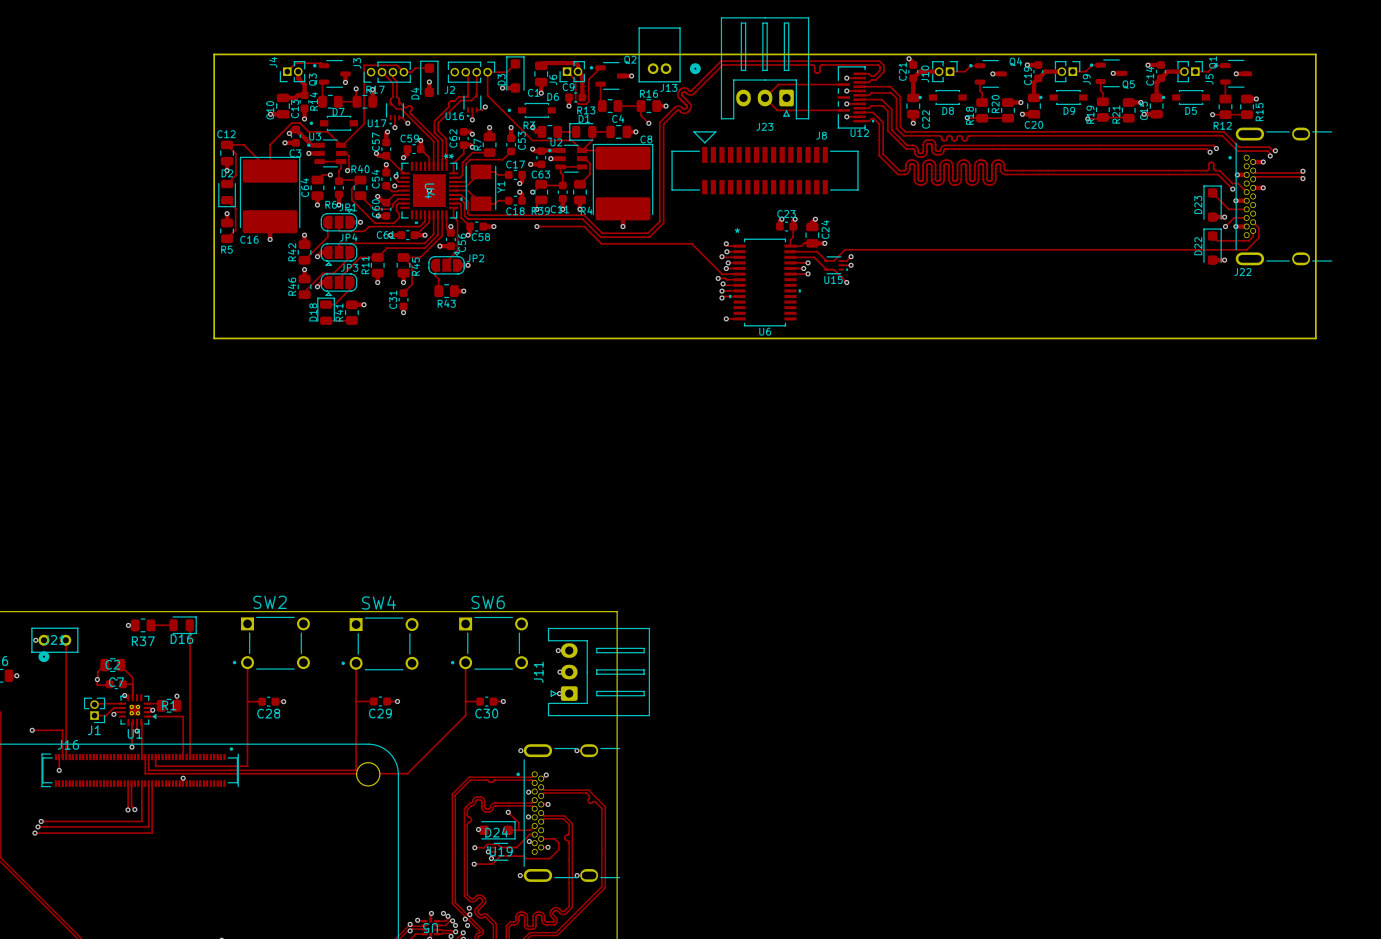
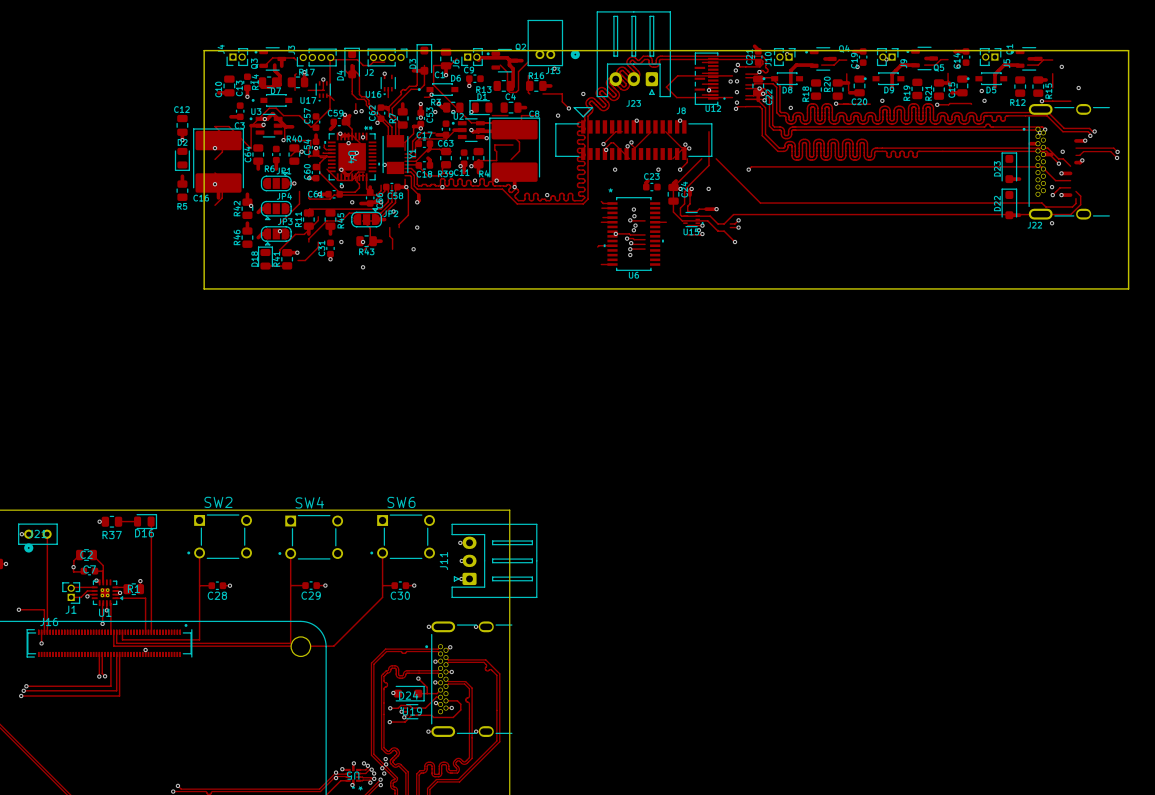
board edge: (214, 54) (1315, 54) (1315, 338) (214, 338) (214, 54) -> (204, 50) (1128, 50) (1128, 288) (204, 288) (204, 50)
via: (909, 58) -> none
track: (515, 63) (507, 72) (487, 72) (487, 95) (532, 140) (572, 140) (582, 150) (592, 140) (592, 131) (610, 131) -> none
via: (1027, 64) -> none
track: (323, 65) (321, 63) (295, 63) (287, 71) -> (296, 60) (294, 57) (272, 57) (265, 65)
track: (541, 65) (543, 63) (575, 63) (577, 65) (577, 71) (582, 75) (582, 97) -> (478, 60) (480, 57) (507, 57) (509, 65) (513, 68) (513, 86)
track: (979, 65) (970, 65) (964, 71) (950, 71) -> (846, 60) (839, 60) (834, 65) (821, 65)
track: (1100, 65) (1092, 65) (1085, 71) (1072, 71) -> (948, 59) (940, 59) (935, 65) (924, 65)
via: (1148, 65) -> none
track: (1225, 65) (1214, 65) (1208, 71) (1195, 71) -> (1052, 60) (1043, 60) (1038, 65) (1027, 65)
track: (600, 67) (588, 79) (588, 101) (586, 104) (578, 104) (575, 101) (575, 80) (567, 71) -> (528, 61) (518, 71) (518, 90) (516, 92) (509, 92) (507, 89) (507, 72) (500, 65)
track: (429, 68) (415, 68) (411, 72) (403, 72) (396, 65) (364, 65) (364, 123) (342, 145) (327, 131) (308, 131) (300, 123) (291, 123) (270, 144) (270, 171) (243, 144) (227, 144) (235, 153) (235, 175) (227, 184) -> (384, 62) (373, 62) (369, 65) (363, 65) (357, 59) (330, 59) (330, 108) (312, 126) (299, 115) (283, 115) (276, 108) (269, 108) (251, 126) (251, 148) (229, 126) (215, 126) (222, 133) (222, 152) (215, 159)
via: none -> (787, 54)
track: (298, 71) (298, 78) (304, 84) (304, 95) (298, 95) (295, 97) (283, 97) -> (274, 65) (274, 70) (280, 75) (280, 84) (261, 87)
track: (939, 71) (919, 71) (913, 78) (913, 97) -> (812, 65) (796, 65) (790, 70) (790, 87)
track: (1061, 71) (1045, 71) (1034, 82) (1034, 97) -> none
track: (1184, 71) (1167, 71) (1156, 82) (1156, 97) -> (1018, 65) (1004, 65) (994, 74) (994, 87)
track: (382, 72) (392, 83) (392, 96) (390, 103) (396, 109) (401, 109) (433, 141) (433, 166) -> none
track: (392, 72) (392, 77) (396, 81) (396, 96) (399, 103) (405, 107) (410, 106) (410, 113) (437, 140) (437, 166) -> none
track: (465, 72) (468, 74) (468, 95) (450, 101) (449, 106) (434, 121) (434, 132) (442, 140) (442, 166) -> (415, 65) (417, 67) (417, 84) (402, 89) (401, 94) (388, 106) (388, 116) (395, 122) (395, 144)
track: (476, 72) (476, 95) (471, 100) (460, 100) (438, 122) (438, 130) (446, 138) (446, 166) -> (424, 65) (424, 84) (420, 89) (411, 89) (392, 108) (392, 114) (398, 121) (399, 144)
track: none -> (456, 58) (449, 65) (433, 65) (433, 85) (471, 122) (519, 122) (521, 115) (536, 115)
track: (859, 73) (869, 73) (874, 76) (879, 70) (879, 67) (877, 64) (821, 64) (819, 72) (816, 73) (812, 64) (722, 64) (693, 93) (689, 94) (683, 92) (681, 94) (690, 103) (690, 109) (684, 113) (677, 110) (663, 124) (663, 223) (649, 237) (600, 237) (582, 219) (467, 219) (464, 215) (464, 203) (460, 199) (453, 199) -> none
via: (992, 73) -> none
via: (1113, 73) -> none
via: (1236, 73) -> none
via: none -> (886, 59)
via: (631, 75) -> none
via: (846, 78) -> none
track: none -> (344, 65) (344, 70) (352, 77) (352, 94) (357, 99) (364, 99) (366, 105) (388, 127) (388, 144)
via: (429, 81) -> none
track: none -> (354, 65) (354, 70) (359, 75) (359, 94) (365, 96) (368, 100) (368, 104) (374, 107)
track: none -> (737, 64) (739, 66) (760, 66) (762, 61) (761, 59) (660, 59) (658, 65) (653, 67) (649, 65) (648, 59) (644, 59) (638, 63) (631, 60) (630, 63) (639, 72) (638, 77) (632, 79) (621, 70) (620, 73) (629, 82) (628, 87) (622, 89) (611, 80) (609, 83) (619, 93) (618, 98) (612, 100) (600, 91) (599, 93) (609, 104) (608, 107) (604, 110) (592, 101) (589, 102) (592, 109) (588, 116) (588, 199) (583, 203) (517, 203) (502, 189) (417, 189) (414, 186) (414, 175) (410, 172) (405, 172)
via: none -> (737, 64)
track: (1100, 81) (1102, 101) -> (915, 65) (901, 65) (892, 74) (892, 87)
track: (1225, 81) (1225, 98) -> (1052, 73) (1052, 87)
track: (323, 82) (322, 101) -> (296, 73) (295, 90)
via: (345, 82) -> none
track: (859, 82) (875, 80) (883, 72) (883, 65) (879, 61) (721, 61) (691, 90) (685, 87) (681, 89) (677, 95) (687, 107) (684, 109) (680, 106) (676, 106) (659, 122) (659, 221) (648, 233) (602, 233) (584, 215) (469, 215) (468, 201) (461, 194) (453, 194) -> none
track: (979, 82) (982, 102) -> (846, 73) (848, 90)
via: none -> (958, 66)
via: none -> (857, 66)
via: none -> (1061, 66)
track: (600, 84) (600, 104) (602, 106) -> (528, 75) (529, 93)
track: (843, 84) (778, 84) (765, 98) (777, 110) (843, 110) -> (732, 75) (677, 75) (666, 87) (676, 97) (732, 97)
via: none -> (554, 68)
track: (859, 86) (890, 86) (900, 96) (900, 126) (905, 131) (1223, 131) (1239, 147) (1269, 147) (1275, 150) -> none
via: none -> (735, 70)
track: (356, 88) (356, 101) (338, 101) -> (323, 79) (323, 90) (308, 90)
via: (356, 88) -> none
via: (502, 88) -> none
via: none -> (759, 72)
via: (846, 90) -> none
via: none -> (384, 73)
track: none -> (745, 74) (757, 74) (761, 70) (766, 72) (766, 59) (762, 56) (660, 56) (653, 63) (648, 56) (643, 56) (638, 60) (633, 57) (629, 57) (627, 63) (636, 75) (633, 76) (624, 67) (619, 68) (616, 74) (626, 85) (623, 86) (613, 77) (609, 78) (606, 84) (615, 95) (613, 97) (603, 88) (598, 88) (596, 94) (605, 105) (603, 107) (593, 98) (589, 98) (586, 103) (589, 109) (584, 114) (584, 121) (577, 123) (578, 126) (584, 128) (583, 130) (577, 132) (578, 135) (584, 136) (583, 139) (577, 141) (578, 143) (584, 145) (583, 148) (577, 150) (578, 152) (584, 154) (583, 156) (577, 158) (578, 161) (584, 162) (583, 165) (577, 167) (578, 169) (584, 171) (583, 174) (577, 175) (578, 178) (584, 180) (583, 182) (577, 184) (578, 187) (584, 188) (584, 191) (578, 193) (579, 195) (584, 197) (581, 200) (573, 200) (570, 193) (568, 194) (566, 200) (564, 199) (562, 193) (559, 194) (558, 200) (553, 195) (549, 200) (539, 200) (536, 193) (533, 194) (533, 200) (530, 200) (529, 194) (526, 193) (524, 200) (518, 200) (514, 196) (518, 191) (517, 189) (510, 192) (509, 184) (494, 185) (491, 181) (485, 185) (482, 178) (480, 179) (478, 185) (471, 185) (469, 180) (466, 181) (466, 185) (463, 185) (460, 179) (458, 180) (456, 185) (453, 185) (453, 180) (450, 179) (448, 185) (446, 185) (444, 179) (442, 178) (439, 185) (418, 185) (417, 174) (411, 168) (405, 168)
track: none -> (948, 73) (949, 90)
track: (859, 95) (891, 92) (896, 98) (896, 128) (903, 135) (939, 135) (943, 140) (950, 135) (954, 140) (959, 135) (964, 140) (969, 135) (1222, 135) (1237, 151) (1267, 151) (1270, 156) -> none
track: none -> (745, 77) (771, 77) (779, 86) (779, 111) (787, 113) (790, 120) (792, 120) (793, 114) (797, 112) (801, 113) (803, 120) (806, 120) (807, 106) (811, 103) (817, 106) (819, 120) (821, 119) (822, 107) (825, 103) (831, 106) (833, 120) (835, 120) (837, 114) (840, 112) (845, 114) (847, 120) (850, 120) (851, 114) (855, 112) (859, 113) (862, 120) (865, 120) (866, 113) (872, 112) (875, 120) (878, 120) (879, 109) (884, 106) (889, 108) (890, 119) (893, 120) (894, 108) (900, 106) (904, 108) (904, 119) (907, 120) (909, 106) (915, 103) (918, 106) (919, 119) (921, 120) (923, 106) (928, 103) (933, 106) (934, 120) (937, 120) (938, 114) (941, 112) (946, 113) (949, 120) (951, 120) (954, 112) (960, 113) (962, 120) (965, 120) (967, 113) (973, 112) (976, 115) (977, 120) (979, 120) (981, 114) (984, 112) (1048, 112) (1064, 128) (1089, 128) (1094, 131)
via: none -> (323, 79)
via: (1256, 98) -> none
track: (859, 99) (881, 99) (891, 109) (891, 129) (907, 145) (916, 146) (919, 153) (923, 152) (923, 142) (927, 140) (934, 141) (936, 151) (940, 150) (945, 145) (1213, 145) (1216, 148) -> none
via: none -> (730, 81)
via: none -> (737, 81)
via: (1020, 102) -> none
via: (1140, 102) -> none
via: (846, 103) -> none
track: none -> (745, 84) (773, 83) (776, 87) (776, 112) (779, 115) (785, 116) (786, 121) (789, 123) (794, 122) (797, 115) (800, 116) (802, 123) (808, 122) (811, 107) (814, 108) (815, 121) (822, 123) (825, 119) (825, 107) (827, 107) (829, 120) (832, 123) (838, 122) (840, 115) (843, 116) (845, 122) (851, 123) (854, 116) (856, 115) (859, 122) (864, 123) (868, 121) (868, 116) (871, 115) (873, 122) (879, 123) (882, 120) (883, 110) (885, 109) (887, 121) (893, 123) (897, 120) (897, 110) (900, 109) (901, 121) (907, 123) (911, 120) (911, 108) (914, 107) (916, 121) (922, 123) (925, 120) (926, 108) (928, 107) (930, 120) (933, 123) (939, 122) (941, 115) (944, 116) (945, 121) (948, 123) (953, 122) (956, 115) (958, 116) (960, 122) (966, 123) (969, 116) (972, 115) (974, 122) (979, 123) (983, 121) (985, 115) (991, 116) (994, 121) (999, 115) (1003, 121) (1006, 115) (1047, 115) (1062, 131) (1088, 131) (1090, 135)
track: (485, 106) (482, 109) (476, 109) -> (431, 94) (429, 97) (424, 97)
via: (485, 106) -> none
track: (617, 106) (640, 106) (640, 115) (648, 123) -> (542, 93) (562, 93) (562, 101) (568, 108)
via: (666, 106) -> none
track: (859, 108) (882, 105) (887, 111) (887, 130) (906, 149) (914, 149) (915, 154) (919, 157) (926, 154) (927, 143) (931, 144) (932, 152) (936, 154) (941, 154) (945, 149) (1206, 149) (1210, 152) -> none
via: none -> (1078, 88)
track: none -> (745, 88) (764, 88) (772, 96) (772, 125) (782, 127) (785, 135) (788, 135) (789, 129) (793, 127) (984, 127) (988, 124) (991, 126) (1042, 127) (1045, 129)
via: none -> (759, 88)
via: none -> (708, 90)
track: (859, 112) (873, 112) (883, 122) (883, 154) (899, 170) (905, 170) (908, 161) (916, 161) (919, 181) (922, 180) (923, 164) (927, 160) (935, 163) (937, 181) (940, 179) (940, 163) (945, 160) (952, 163) (954, 181) (957, 179) (957, 163) (962, 160) (969, 163) (971, 181) (974, 179) (975, 163) (979, 160) (986, 163) (988, 181) (991, 179) (992, 163) (996, 160) (1003, 162) (1005, 170) (1206, 170) (1209, 163) (1211, 162) (1214, 170) (1219, 170) (1232, 183) (1238, 183) (1246, 192) -> none
via: none -> (981, 90)
via: none -> (736, 92)
via: (270, 114) -> none
via: (1022, 114) -> none
via: (1144, 114) -> none
track: (1212, 114) (1247, 114) -> (1041, 101) (1070, 101)
via: (1212, 114) -> none
via: none -> (583, 93)
via: none -> (763, 93)
via: none -> (431, 94)
via: (846, 116) -> none
track: (394, 117) (394, 127) -> (355, 103) (355, 112)
track: none -> (745, 95) (765, 93) (769, 98) (769, 126) (773, 130) (780, 130) (781, 136) (785, 138) (790, 137) (793, 130) (1037, 130) (1039, 132)
track: (967, 117) (1007, 118) -> (836, 103) (870, 104)
via: (967, 117) -> none
via: (1087, 118) -> none
track: (1128, 118) (1087, 118) -> (971, 104) (937, 104)
via: (472, 119) -> none
track: (859, 121) (869, 121) (873, 118) (879, 124) (879, 155) (897, 174) (907, 173) (910, 164) (913, 164) (914, 180) (918, 184) (926, 181) (928, 164) (931, 165) (931, 180) (935, 184) (940, 184) (943, 181) (945, 164) (948, 165) (948, 180) (951, 184) (957, 184) (960, 182) (961, 165) (964, 164) (966, 181) (970, 184) (975, 184) (978, 180) (978, 165) (981, 164) (983, 181) (991, 184) (995, 180) (995, 165) (999, 164) (1001, 171) (1005, 174) (1218, 174) (1231, 187) -> none
via: (407, 123) -> none
via: (648, 123) -> none
via: (913, 123) -> none
track: none -> (764, 100) (763, 99) (745, 99) (757, 99) (765, 107) (765, 134) (779, 148) (784, 147) (787, 141) (793, 142) (796, 156) (799, 156) (799, 142) (802, 139) (809, 141) (810, 156) (813, 156) (813, 143) (816, 139) (820, 139) (823, 141) (825, 156) (828, 155) (828, 141) (836, 140) (838, 143) (838, 155) (841, 156) (843, 141) (850, 139) (852, 142) (853, 156) (855, 156) (857, 142) (862, 139) (867, 142) (868, 156) (871, 156) (872, 150) (875, 148) (1047, 148) (1058, 158) (1063, 158) (1070, 166)
via: none -> (764, 100)
via: none -> (882, 100)
via: none -> (984, 100)
via: none -> (1041, 101)
via: none -> (736, 102)
via: (394, 127) -> none
via: (489, 127) -> none
via: none -> (836, 103)
via: none -> (937, 104)
track: (387, 131) (386, 142) -> (349, 115) (348, 124)
via: (387, 131) -> none
track: (557, 131) (576, 131) -> (492, 115) (507, 115)
via: (635, 131) -> none
via: none -> (568, 108)
via: none -> (790, 107)
track: (289, 133) (295, 129) (311, 145) (319, 145) -> none
via: (289, 133) -> none
track: none -> (736, 108) (738, 106) (759, 106) (762, 109) (762, 135) (777, 151) (785, 150) (788, 145) (791, 145) (792, 157) (796, 160) (802, 157) (803, 142) (806, 143) (806, 156) (809, 159) (816, 157) (818, 142) (820, 143) (820, 156) (823, 159) (830, 158) (831, 143) (834, 142) (835, 157) (838, 160) (843, 159) (845, 156) (845, 143) (848, 142) (850, 157) (856, 160) (860, 156) (860, 143) (862, 142) (864, 157) (868, 160) (873, 158) (875, 151) (885, 151) (888, 157) (893, 151) (897, 157) (901, 151) (906, 157) (910, 151) (914, 157) (919, 151) (1046, 151) (1057, 162)
via: none -> (736, 108)
via: (472, 134) -> none
track: none -> (378, 110) (377, 112) (391, 127) (391, 144)
via: none -> (361, 111)
via: none -> (355, 112)
via: none -> (435, 112)
via: none -> (453, 112)
via: none -> (471, 112)
via: none -> (558, 115)
via: (284, 142) -> none
via: none -> (420, 117)
track: none -> (264, 119) (272, 113) (285, 126) (292, 126)
via: none -> (264, 119)
track: (472, 147) (470, 144) (463, 145) (463, 153) (453, 163) (453, 173) -> (420, 128) (413, 126) (413, 133) (405, 142) (405, 150)
via: (472, 147) -> none
via: none -> (636, 120)
via: none -> (680, 120)
via: (1216, 148) -> none
track: (532, 149) (534, 151) (560, 150) -> (471, 130) (473, 131) (494, 131)
via: (532, 149) -> none
via: none -> (377, 122)
via: (1275, 150) -> none
track: (511, 151) (502, 159) (470, 159) (466, 164) (466, 181) (453, 181) -> (453, 132) (446, 138) (419, 138) (415, 142) (415, 157) (405, 157)
via: none -> (263, 124)
track: (489, 152) (472, 152) (462, 162) (462, 175) (459, 177) (453, 177) -> (435, 133) (420, 133) (412, 141) (412, 151) (410, 154) (405, 154)
via: (1210, 152) -> none
via: (308, 153) -> none
track: (376, 153) (378, 155) (386, 155) (405, 173) -> none
via: (376, 153) -> none
via: none -> (420, 128)
via: (1270, 156) -> none
via: (403, 157) -> none
via: (550, 158) -> none
via: none -> (471, 130)
track: (582, 158) (585, 158) (589, 163) (589, 174) (579, 184) -> (512, 138) (519, 142) (519, 151) (511, 159)
via: none -> (1045, 129)
track: none -> (622, 131) (615, 131) (603, 144)
track: none -> (651, 131) (635, 147) (631, 142)
track: none -> (665, 131) (681, 147) (684, 147) (685, 144)
track: none -> (708, 131) (708, 165) (686, 188) (684, 203) (680, 208) (680, 214) (710, 216) (718, 223) (724, 223) (733, 214) (1070, 214) (1080, 204) (1080, 196) (1075, 191)
via: none -> (1094, 131)
track: (319, 161) (341, 161) (338, 181) (360, 179) (351, 188) (351, 199) (375, 223) (394, 223) (399, 217) (396, 205) (398, 203) (405, 203) -> (292, 140) (310, 140) (308, 156) (326, 155) (319, 163) (319, 172) (339, 192) (355, 192) (359, 187) (357, 177) (364, 175)
via: none -> (1039, 132)
track: none -> (340, 133) (342, 135) (352, 135) (364, 147) (364, 150)
via: none -> (340, 133)
track: (1253, 162) (1263, 162) -> (1075, 140) (1084, 140)
via: (1263, 162) -> none
via: (386, 164) -> none
via: (530, 164) -> none
via: none -> (1090, 135)
track: (582, 166) (560, 166) (562, 185) (541, 184) (532, 192) -> (512, 145) (494, 145) (496, 160) (478, 159) (471, 166)
via: none -> (363, 137)
via: none -> (486, 138)
track: (1253, 170) (1255, 172) (1301, 172) (1302, 171) -> none
via: none -> (631, 142)
track: (330, 174) (322, 174) (317, 179) -> (301, 151) (295, 151) (290, 155)
via: (330, 174) -> none
via: none -> (348, 143)
track: (508, 174) (498, 174) (495, 171) (480, 171) (466, 186) (453, 186) -> (451, 151) (428, 149) (415, 161) (405, 161)
via: (1237, 174) -> none
via: none -> (603, 144)
via: none -> (685, 144)
via: (396, 176) -> none
via: none -> (627, 146)
track: (1302, 178) (1301, 176) (1255, 176) (1253, 179) -> none
via: (1302, 178) -> none
via: none -> (215, 148)
via: none -> (316, 148)
track: none -> (689, 148) (681, 150) (672, 158)
via: none -> (689, 148)
track: none -> (1075, 148) (1113, 148) (1117, 151)
track: none -> (606, 149) (611, 142) (613, 142) (629, 158)
via: none -> (606, 149)
via: (519, 183) -> none
via: none -> (301, 151)
via: none -> (1062, 151)
via: none -> (1117, 151)
via: (394, 185) -> none
via: none -> (356, 152)
via: (1263, 187) -> none
track: none -> (1075, 155) (1079, 155) (1083, 151) (1110, 151) (1117, 157)
via: (1232, 189) -> none
track: (453, 190) (467, 190) (480, 203) (495, 203) (498, 200) (508, 200) -> (405, 164) (417, 164) (428, 175) (451, 173)
via: none -> (1117, 157)
via: (519, 192) -> none
via: (532, 192) -> none
track: none -> (687, 158) (687, 162) (680, 169)
track: none -> (701, 158) (673, 187) (673, 212) (682, 220) (707, 220) (718, 231)
track: none -> (716, 158) (760, 203) (1041, 203) (1045, 207) (1072, 207) (1075, 203) (1075, 198)
track: (1212, 193) (1228, 209) (1246, 209) -> none
track: (405, 194) (394, 194) (386, 202) (377, 196) -> (364, 168) (355, 168) (348, 175) (341, 169)
track: none -> (1082, 160) (1075, 162)
via: none -> (1082, 160)
track: (360, 195) (373, 209) (390, 209) (397, 199) (405, 199) -> (326, 169) (338, 180) (352, 180) (358, 172) (364, 172)
via: (377, 196) -> none
via: none -> (1058, 163)
track: (227, 200) (235, 208) (235, 230) (227, 238) -> (215, 172) (222, 180) (222, 198) (215, 205)
via: none -> (384, 164)
track: (1235, 200) (1246, 200) -> (1061, 173) (1070, 173)
via: (1235, 200) -> none
via: none -> (460, 166)
via: none -> (471, 166)
track: (453, 203) (461, 204) (461, 217) (470, 226) (468, 235) -> (405, 175) (411, 176) (411, 187) (418, 195) (417, 202)
via: (317, 205) -> none
via: (338, 205) -> none
via: none -> (615, 169)
via: none -> (658, 169)
via: none -> (680, 169)
track: none -> (748, 169) (751, 166) (1041, 166) (1055, 180) (1070, 180)
via: none -> (748, 169)
via: none -> (341, 169)
track: (453, 207) (453, 216) (457, 220) (457, 250) (446, 261) (446, 265) -> (405, 179) (405, 187) (408, 190) (408, 215) (399, 224) (399, 227)
via: (536, 209) -> none
via: (562, 209) -> none
via: (579, 209) -> none
via: none -> (1061, 173)
via: (227, 213) -> none
track: (425, 214) (425, 221) (419, 226) (369, 226) (364, 231) (339, 231) (338, 222) -> (381, 185) (381, 190) (376, 195) (334, 195) (330, 199) (309, 199) (308, 191)
track: (429, 214) (429, 221) (414, 235) (425, 235) -> (384, 185) (384, 191) (372, 202) (381, 202)
track: (433, 214) (433, 234) (424, 243) (339, 243) (338, 252) -> (388, 185) (388, 201) (380, 209) (309, 209) (308, 216)
track: (437, 214) (437, 235) (424, 248) (387, 248) (377, 257) (360, 257) (338, 278) (338, 282) -> (391, 185) (391, 202) (381, 213) (349, 213) (341, 220) (326, 220) (308, 238) (308, 242)
track: (442, 214) (442, 235) (420, 257) (403, 257) (412, 266) (412, 284) (403, 293) -> (395, 185) (395, 202) (377, 220) (363, 220) (370, 228) (370, 243) (363, 250)
via: (1224, 217) -> none
track: (1246, 217) (1234, 217) (1225, 226) -> (1070, 187) (1059, 187) (1052, 195)
via: none -> (474, 180)
via: none -> (496, 180)
via: (781, 219) -> none
track: (795, 219) (793, 221) (793, 237) (790, 239) (790, 246) (801, 246) (804, 243) (824, 243) -> (691, 188) (687, 211) (716, 209)
via: (795, 219) -> none
via: (815, 219) -> none
track: (327, 222) (327, 237) (304, 260) -> (299, 191) (299, 203) (280, 223)
track: (1253, 222) (1258, 227) (1258, 238) (1247, 249) (845, 249) (833, 261) (826, 261) (817, 251) (790, 251) -> none
via: none -> (341, 186)
via: (450, 226) -> none
track: (536, 226) (584, 226) (601, 243) (691, 243) (722, 274) (739, 274) -> none
via: (1225, 226) -> none
track: (1235, 226) (1246, 226) -> (1061, 195) (1070, 195)
via: (1235, 226) -> none
via: none -> (1052, 187)
via: none -> (680, 188)
via: none -> (691, 188)
via: none -> (708, 188)
track: (1253, 230) (1253, 236) (1249, 240) (1217, 240) (1212, 236) -> none
via: (304, 235) -> none
via: (425, 235) -> none
via: (468, 235) -> none
via: none -> (547, 195)
via: none -> (1052, 195)
via: none -> (1061, 195)
via position: (270, 239) -> (215, 184)
via: (726, 243) -> none
via: (824, 243) -> none
via: none -> (352, 202)
via: none -> (381, 202)
via: none -> (417, 202)
via: (439, 246) -> none
via: none -> (251, 205)
via: (726, 251) -> none
track: (350, 252) (350, 256) (333, 273) (322, 273) (304, 291) (304, 294) -> (318, 216) (318, 220) (304, 234) (295, 234) (280, 249) (280, 252)
via: none -> (716, 209)
via: none -> (633, 209)
via: none -> (393, 211)
via: (317, 256) -> none
track: (721, 256) (739, 257) -> (630, 220) (645, 220)
via: (721, 256) -> none
track: (851, 256) (846, 260) (841, 260) -> (738, 220) (734, 223) (730, 223)
via: (851, 256) -> none
track: (790, 257) (814, 257) (826, 269) -> none
via: (1224, 260) -> none
via: none -> (634, 216)
via: (728, 262) -> none
track: (790, 262) (808, 262) -> (687, 225) (702, 225)
via: (808, 262) -> none
track: (435, 265) (435, 275) (438, 278) (438, 291) -> (389, 227) (392, 249)
via: (468, 265) -> none
track: (841, 265) (851, 265) -> (730, 227) (738, 227)
via: (851, 265) -> none
via: none -> (630, 220)
via: none -> (738, 220)
via: (726, 268) -> none
via: (803, 268) -> none
via: (304, 269) -> none
track: (826, 269) (833, 269) (846, 282) -> (718, 231) (724, 231) (734, 242)
via: none -> (1052, 223)
via: none -> (635, 225)
via: none -> (702, 225)
track: (808, 273) (790, 274) -> (702, 234) (687, 234)
via: (808, 273) -> none
via: none -> (417, 227)
via: none -> (738, 227)
track: (718, 278) (739, 279) -> (627, 238) (645, 239)
via: (718, 278) -> none
via: none -> (633, 230)
via: none -> (698, 230)
via: none -> (280, 231)
track: (350, 282) (350, 289) (334, 304) (326, 304) -> (318, 242) (318, 247) (305, 260) (298, 260)
via: (377, 282) -> none
via position: (403, 282) -> (341, 242)
track: none -> (615, 233) (645, 234)
via: none -> (615, 233)
track: (723, 283) (739, 285) -> (631, 243) (645, 244)
via: (723, 283) -> none
via: (317, 286) -> none
via: none -> (627, 238)
track: (739, 290) (721, 291) -> (645, 249) (630, 249)
via: (463, 291) -> none
via: (721, 291) -> none
via: none -> (363, 242)
via: none -> (734, 242)
via: none -> (631, 243)
via: (721, 298) -> none
via: none -> (413, 249)
via: none -> (630, 249)
via: none -> (630, 255)
via: (726, 318) -> none
via: none -> (363, 267)

